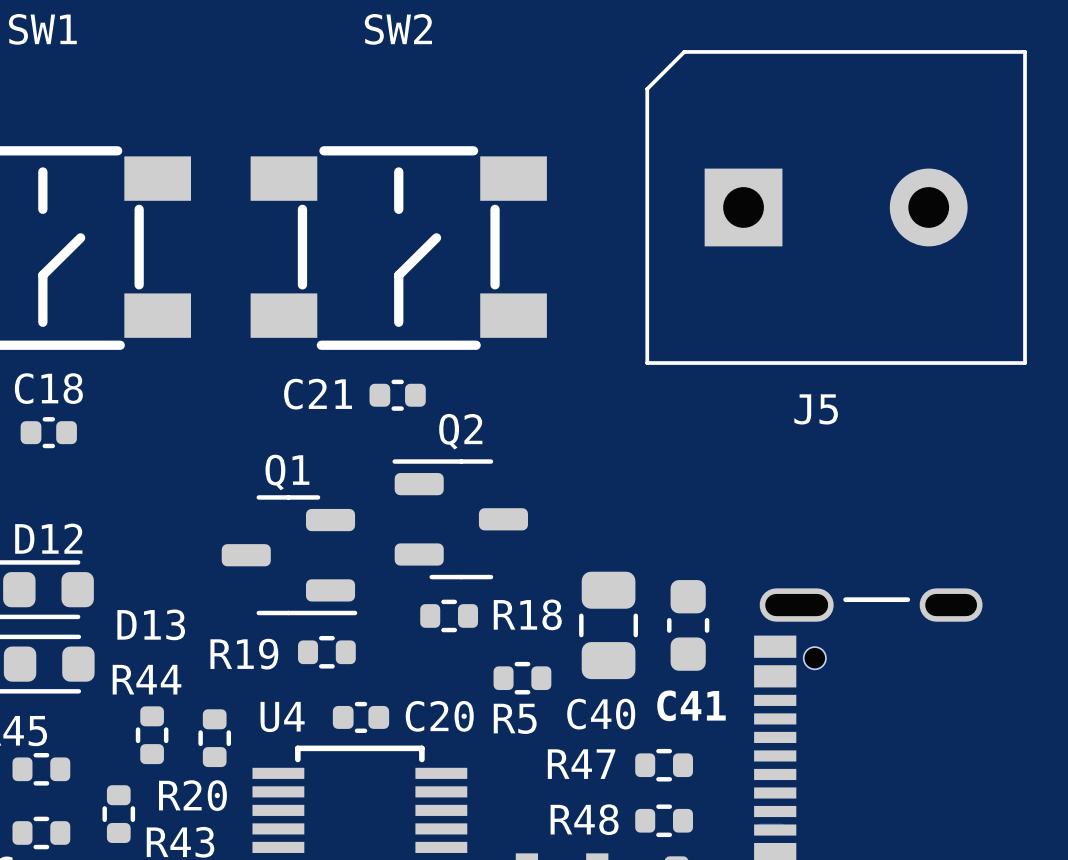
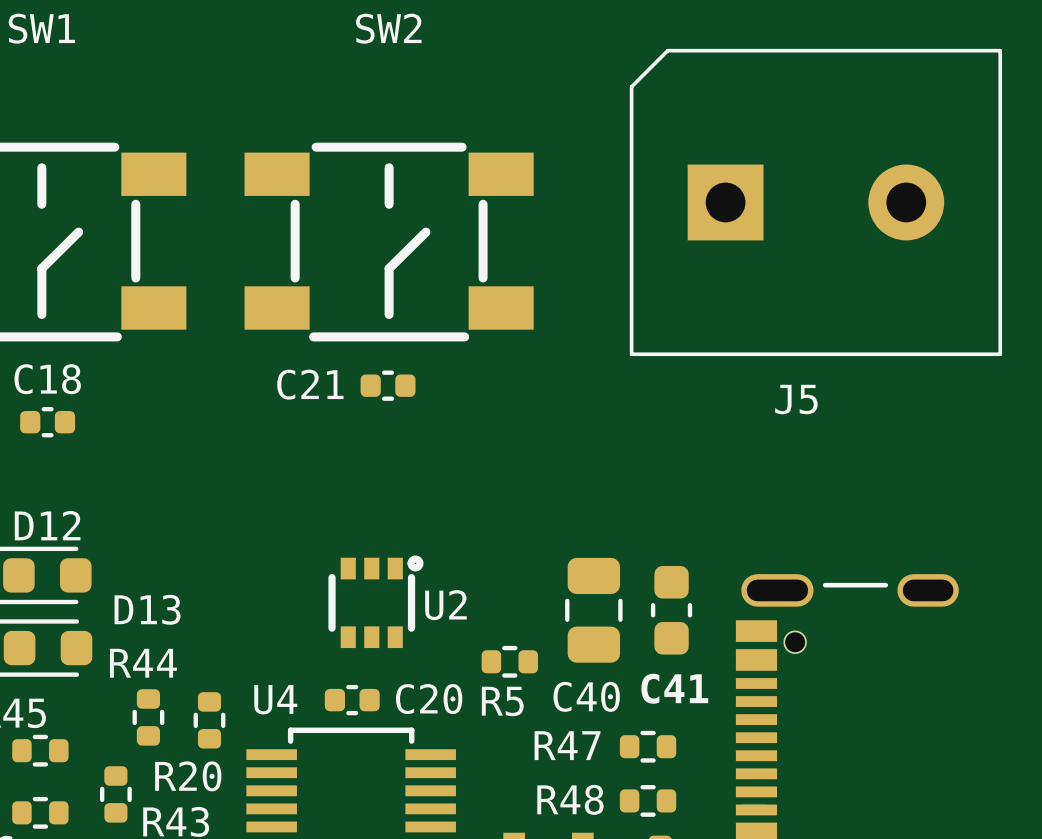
Q2: (460, 519) -> none
Q1: (289, 555) -> none
R18: (449, 615) -> none
U2: none -> (375, 601)
R19: (326, 652) -> none

